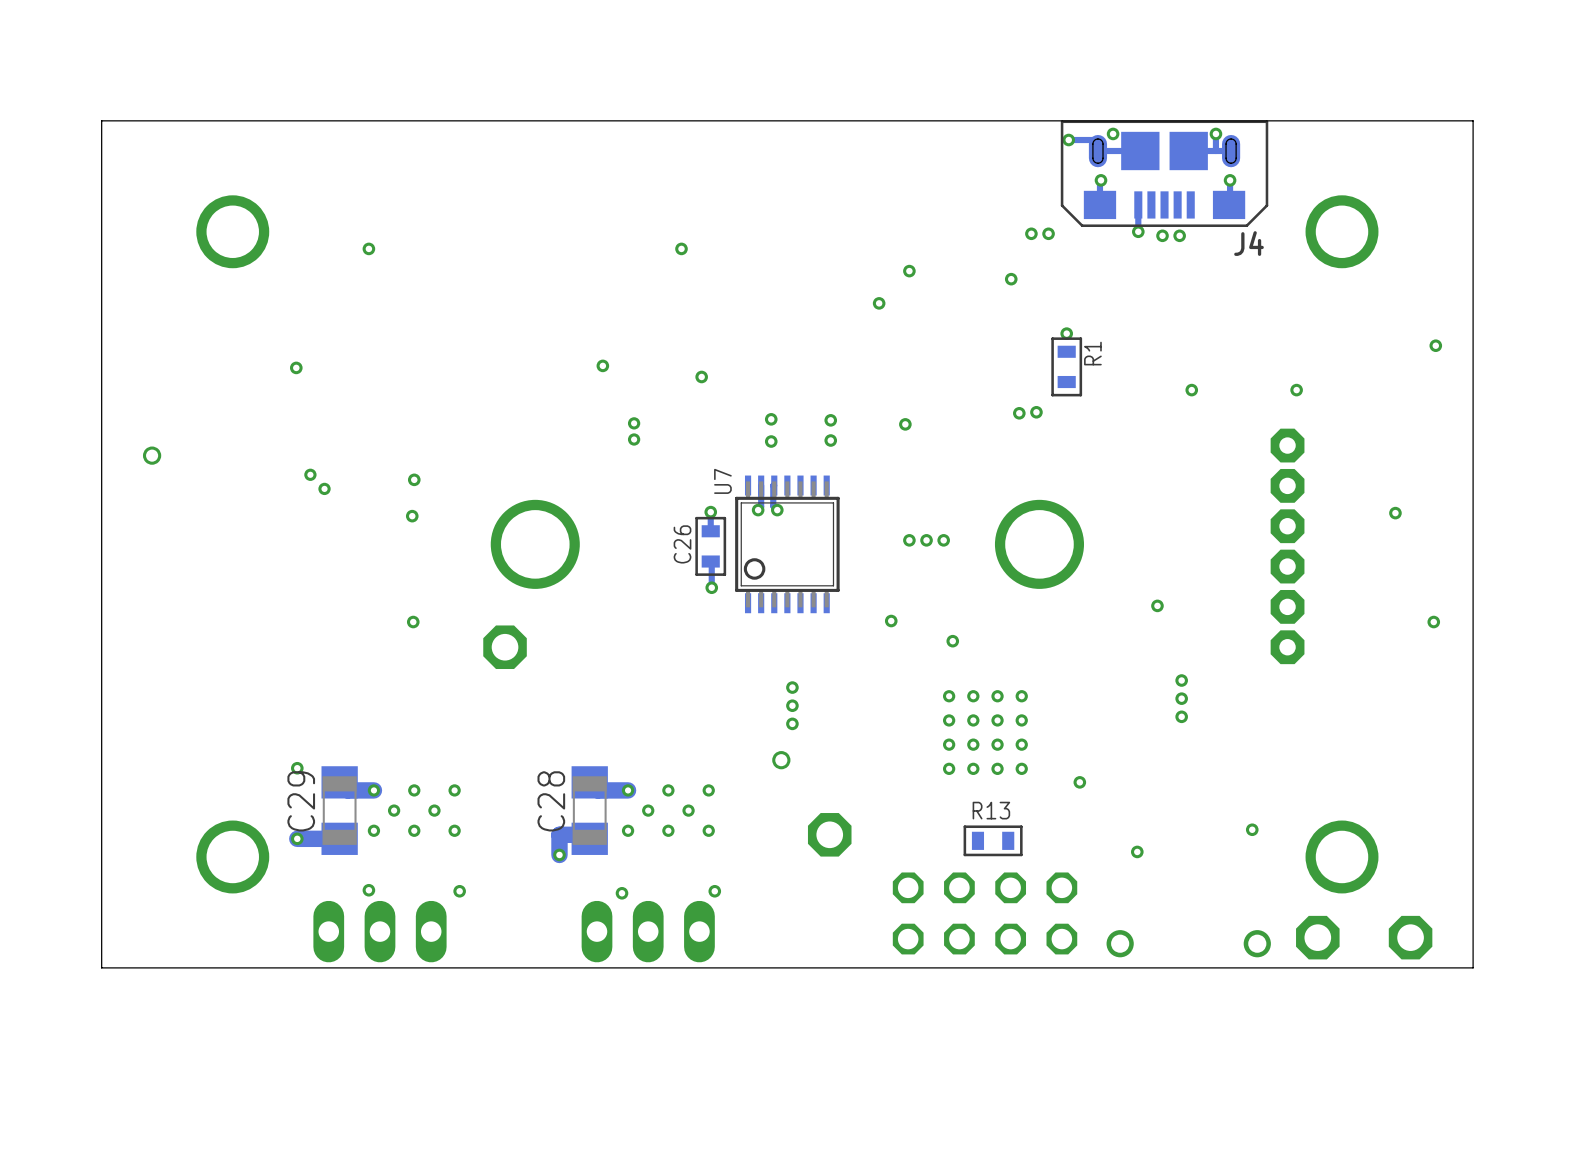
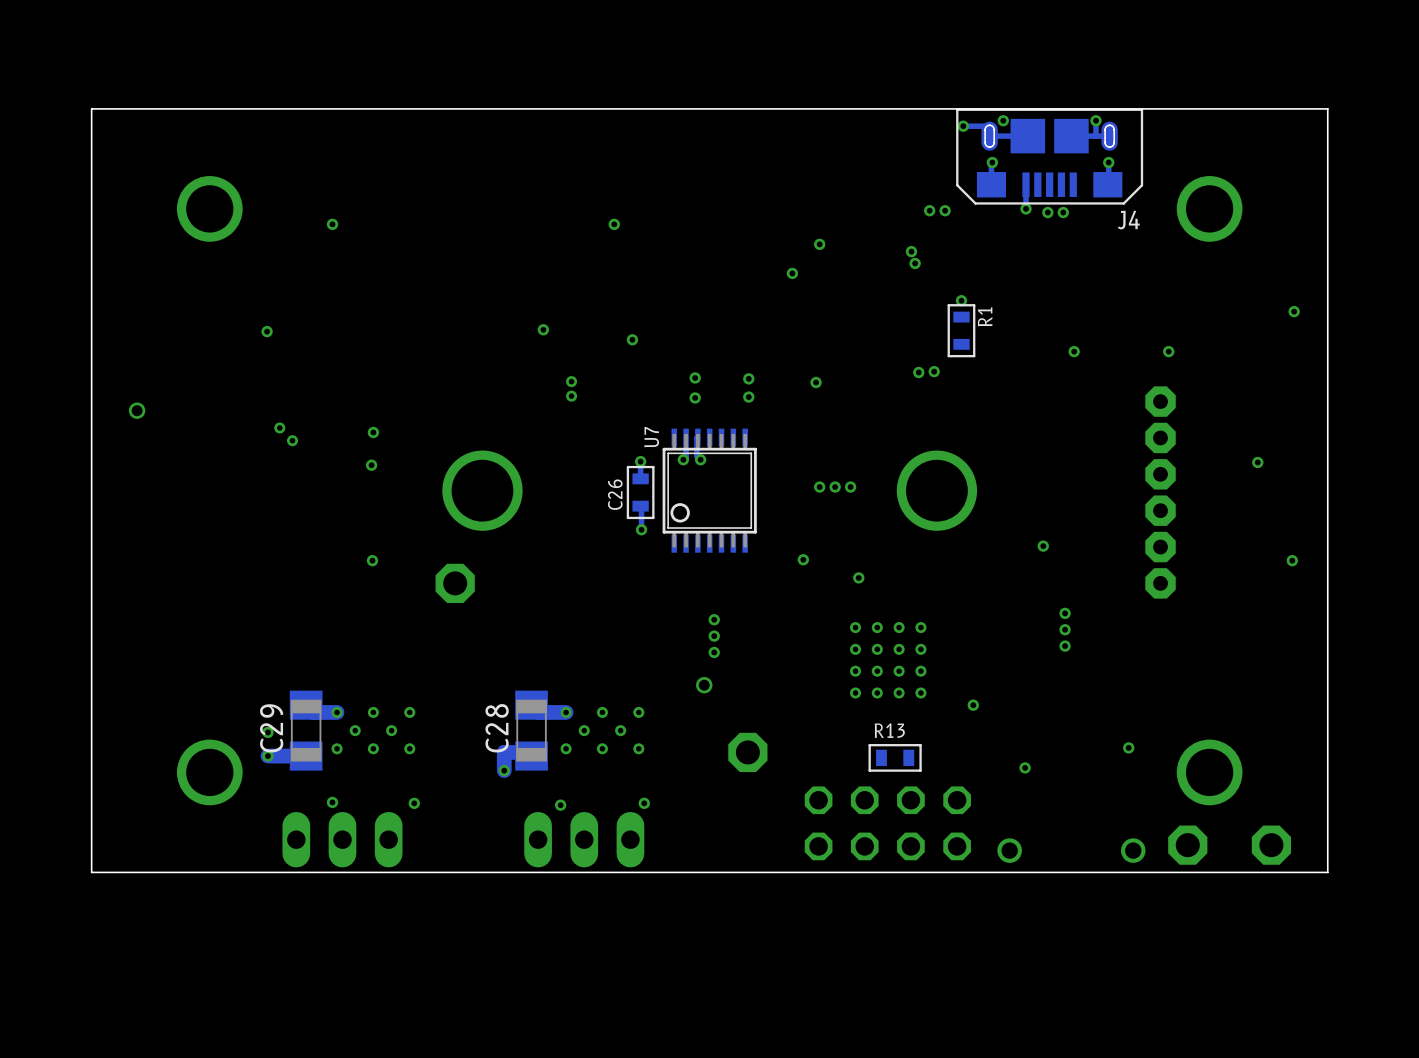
via: none -> (915, 263)
via position: (297, 768) -> (267, 732)

